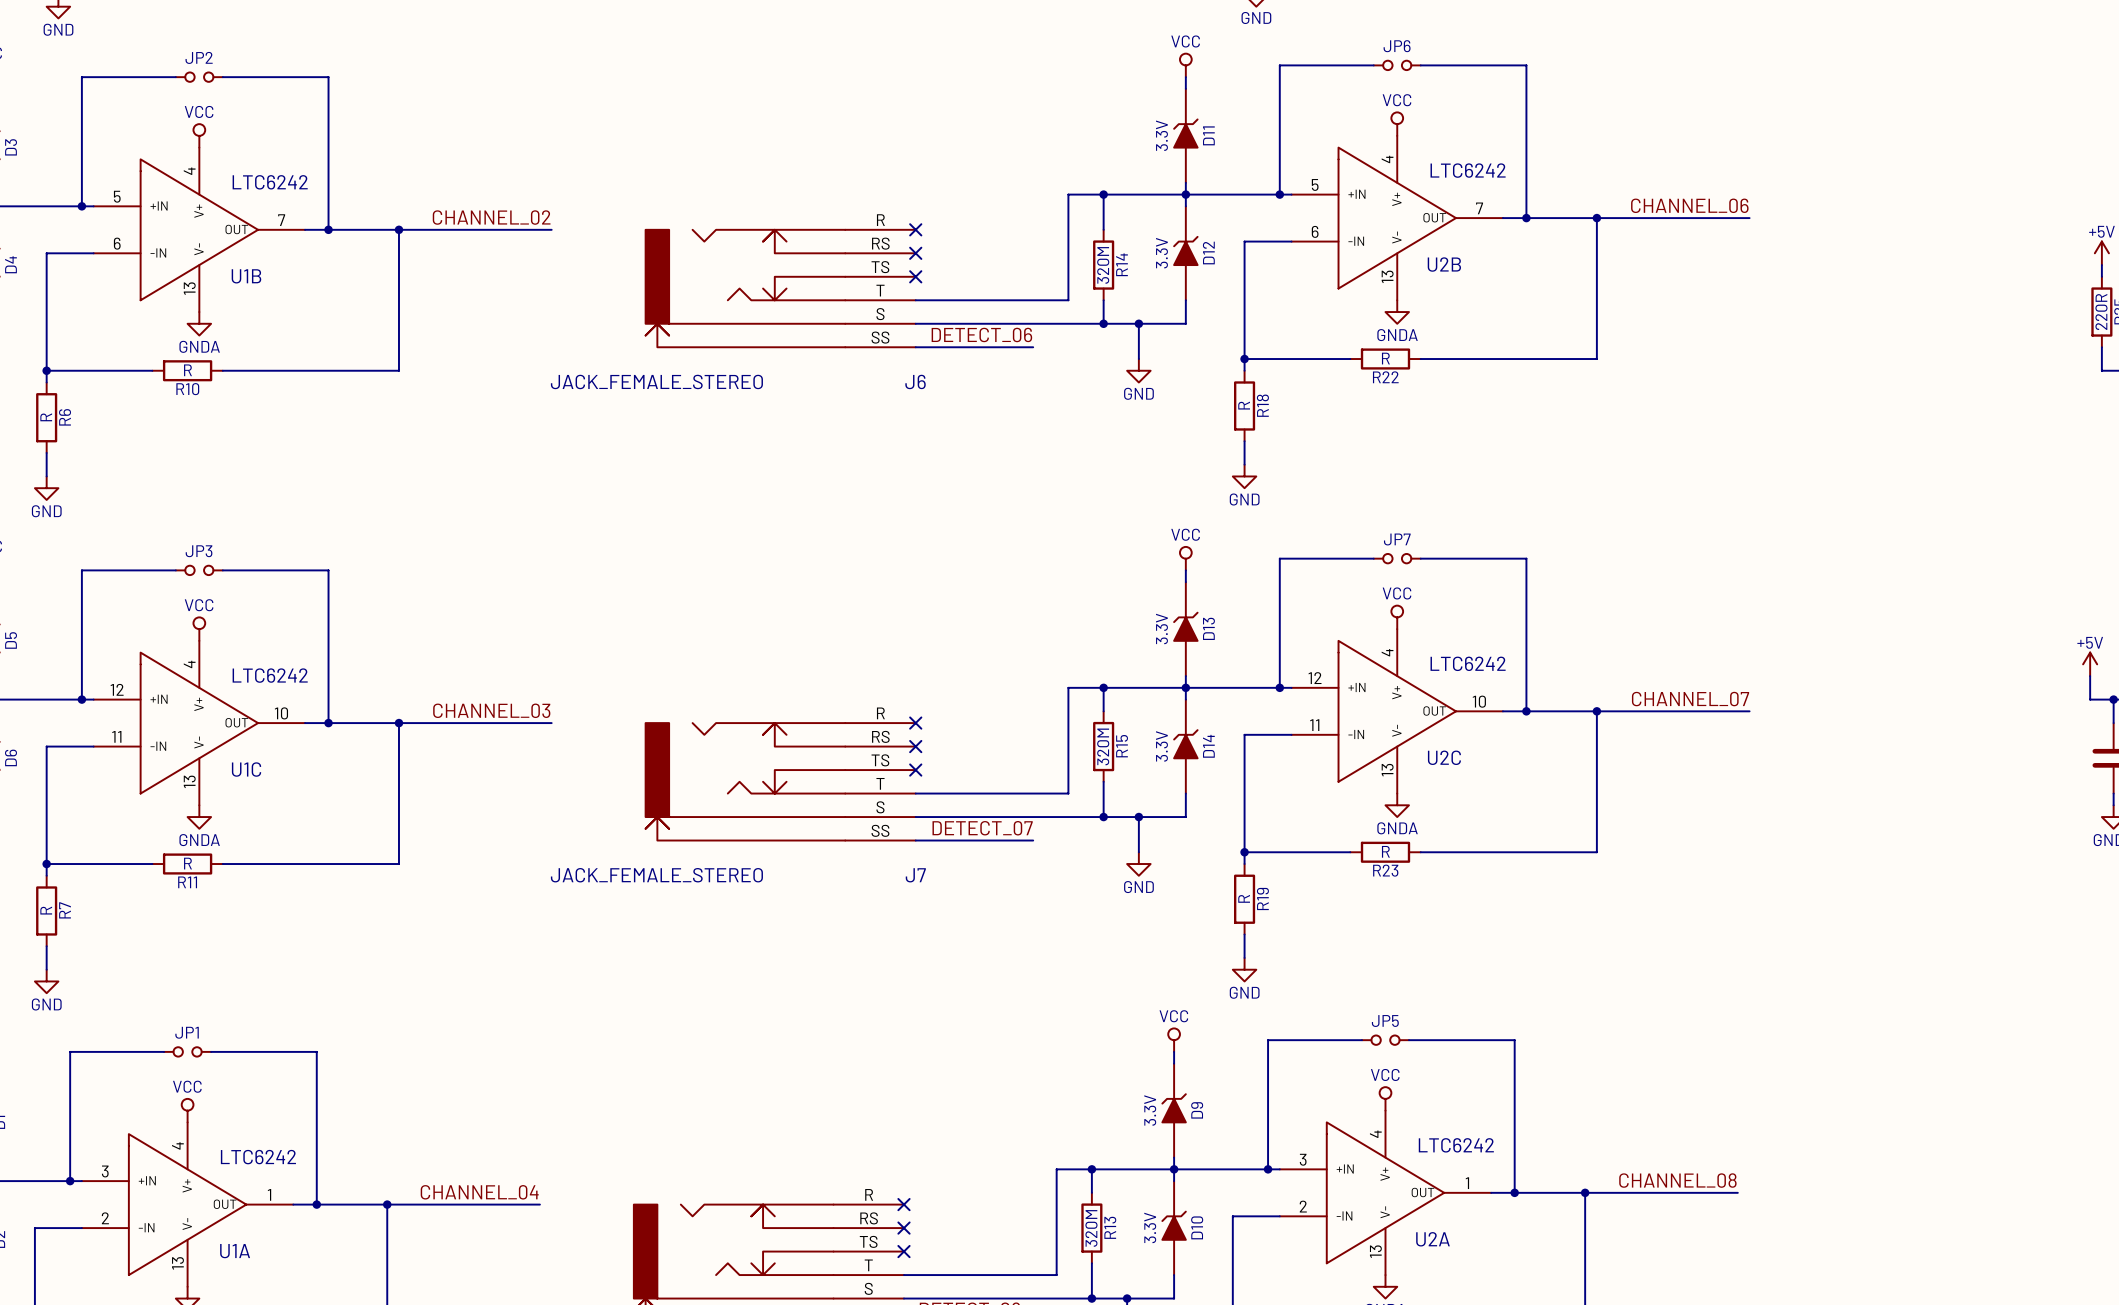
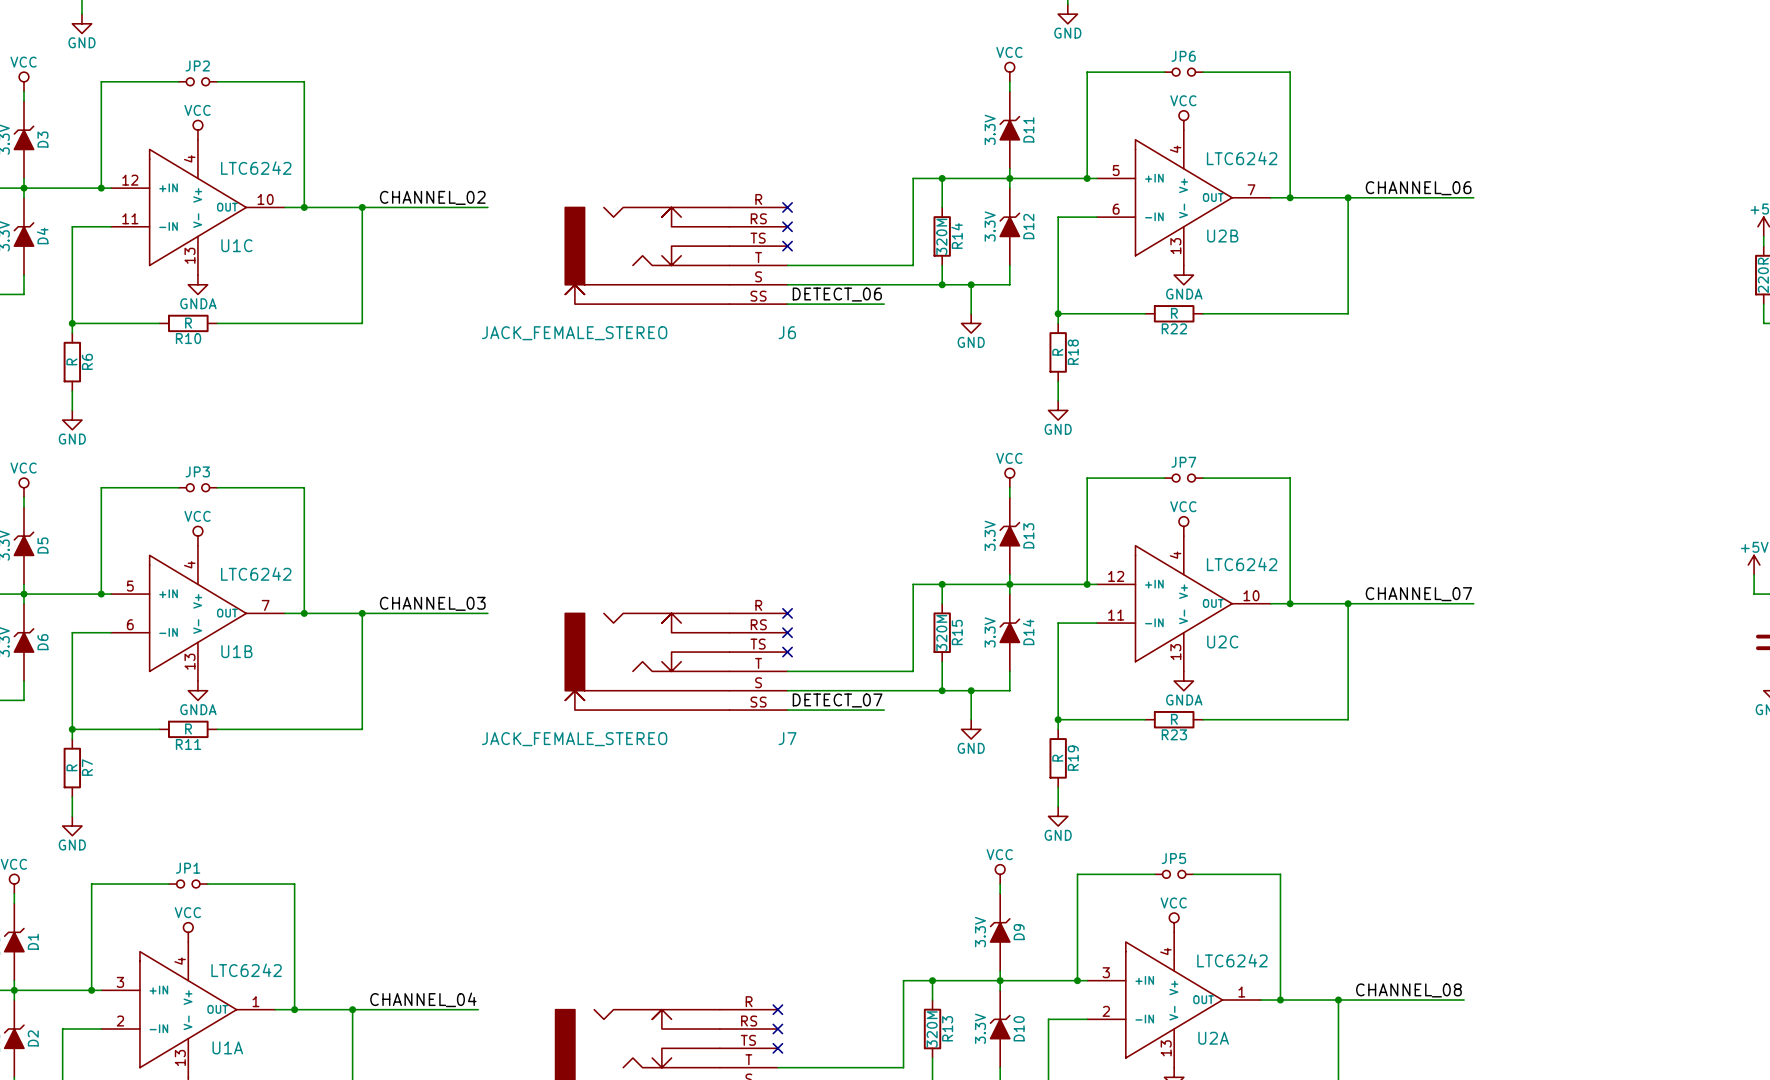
U1B position: (199, 229) -> (197, 613)
U1C position: (199, 723) -> (197, 207)

